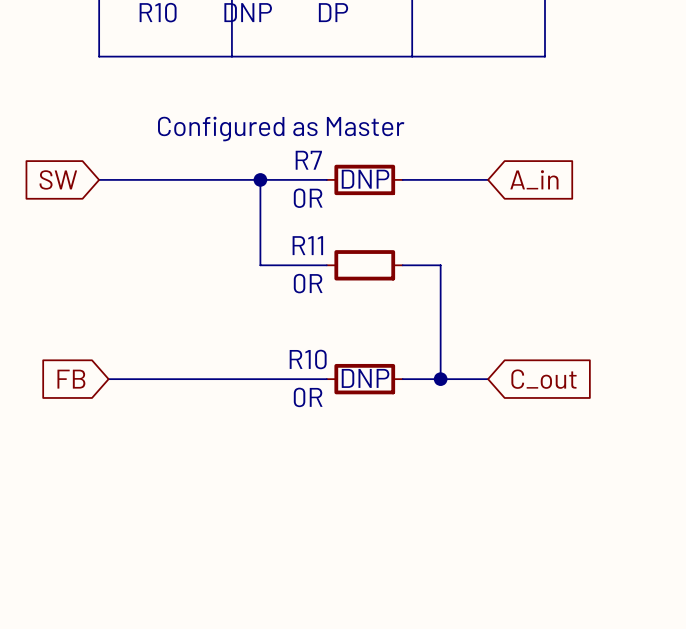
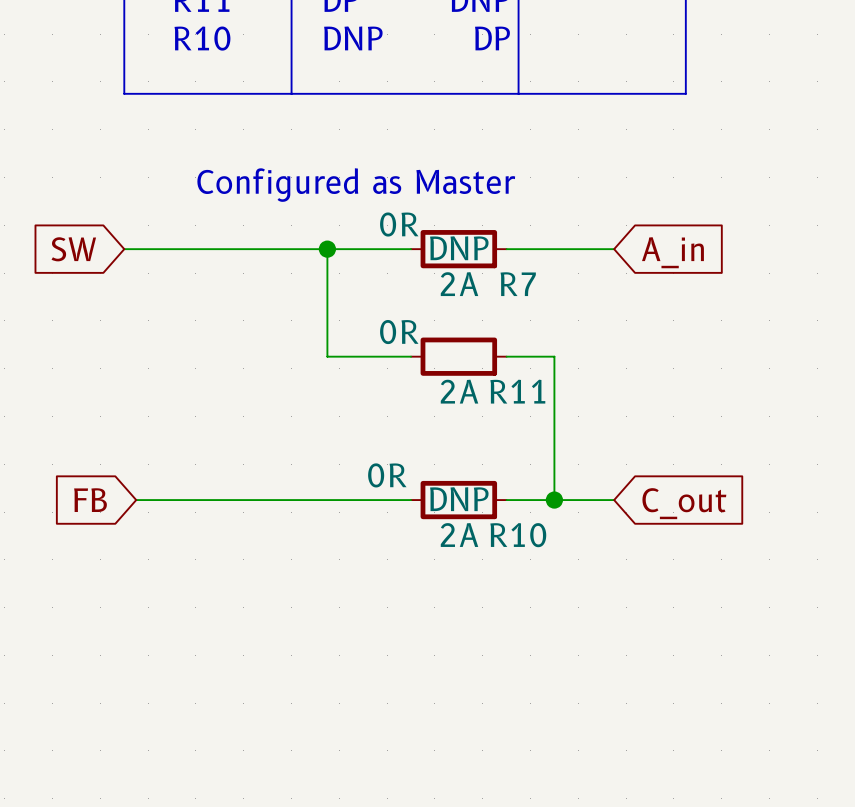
R7 name position: R7 (308, 160) -> R7 (518, 284)
R7 text position: 0R (308, 198) -> 0R (399, 224)
R7 text: none -> 2A (459, 284)
R11 name position: R11 (307, 245) -> R11 (517, 391)
R11 text position: 0R (308, 283) -> 0R (399, 332)
R11 text: none -> 2A (459, 391)
R10 name position: R10 (308, 359) -> R10 (518, 535)
R10 text position: 0R (308, 397) -> 0R (387, 475)
R10 text: none -> 2A (459, 535)

